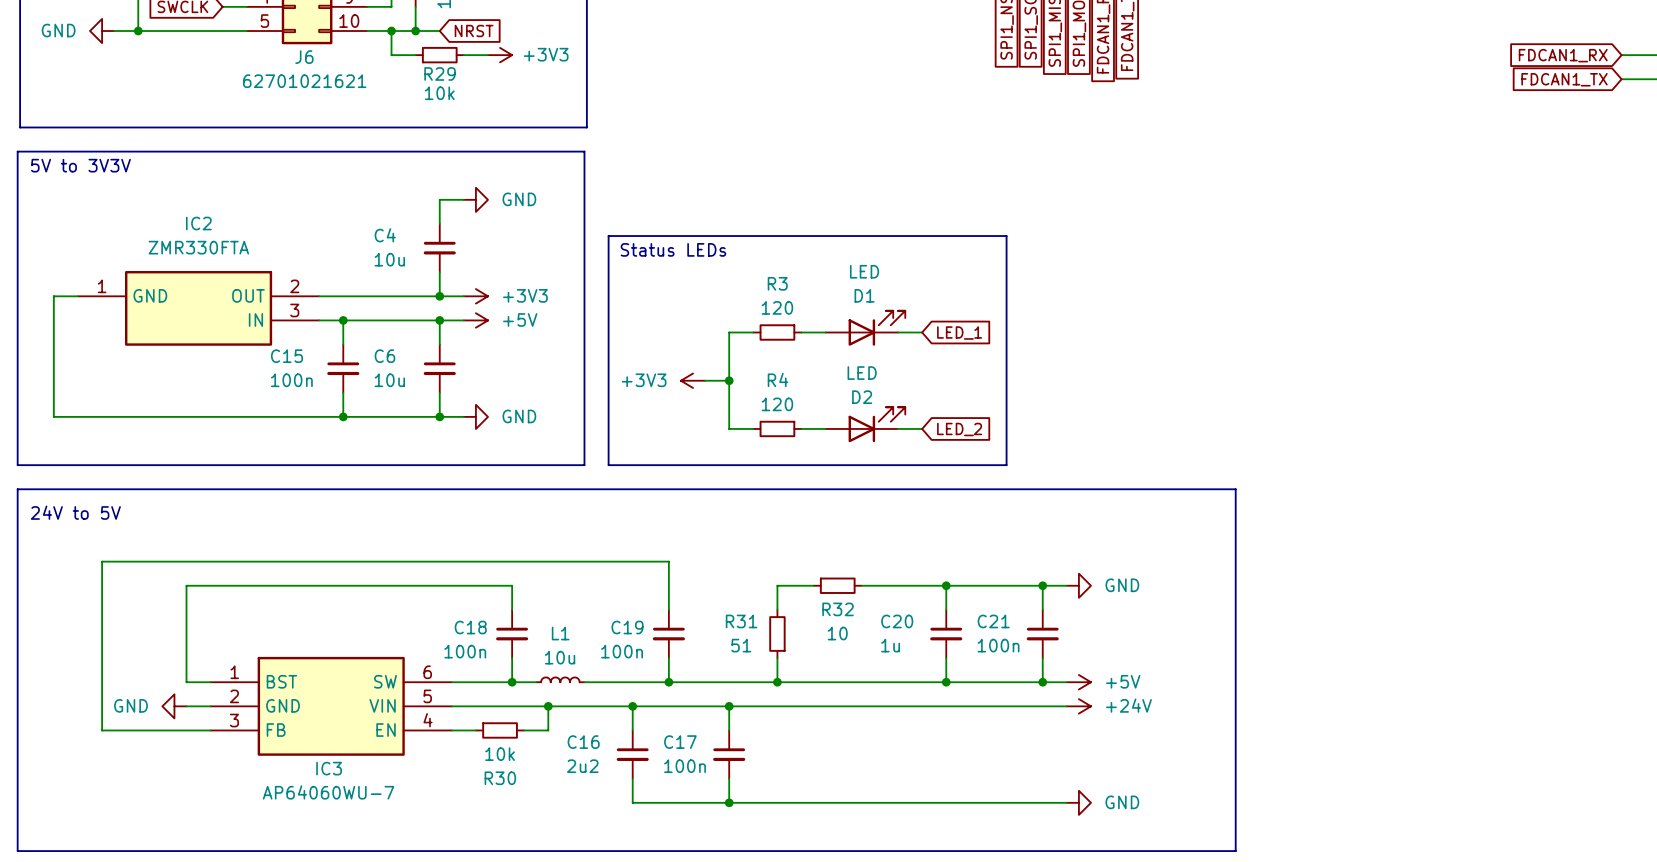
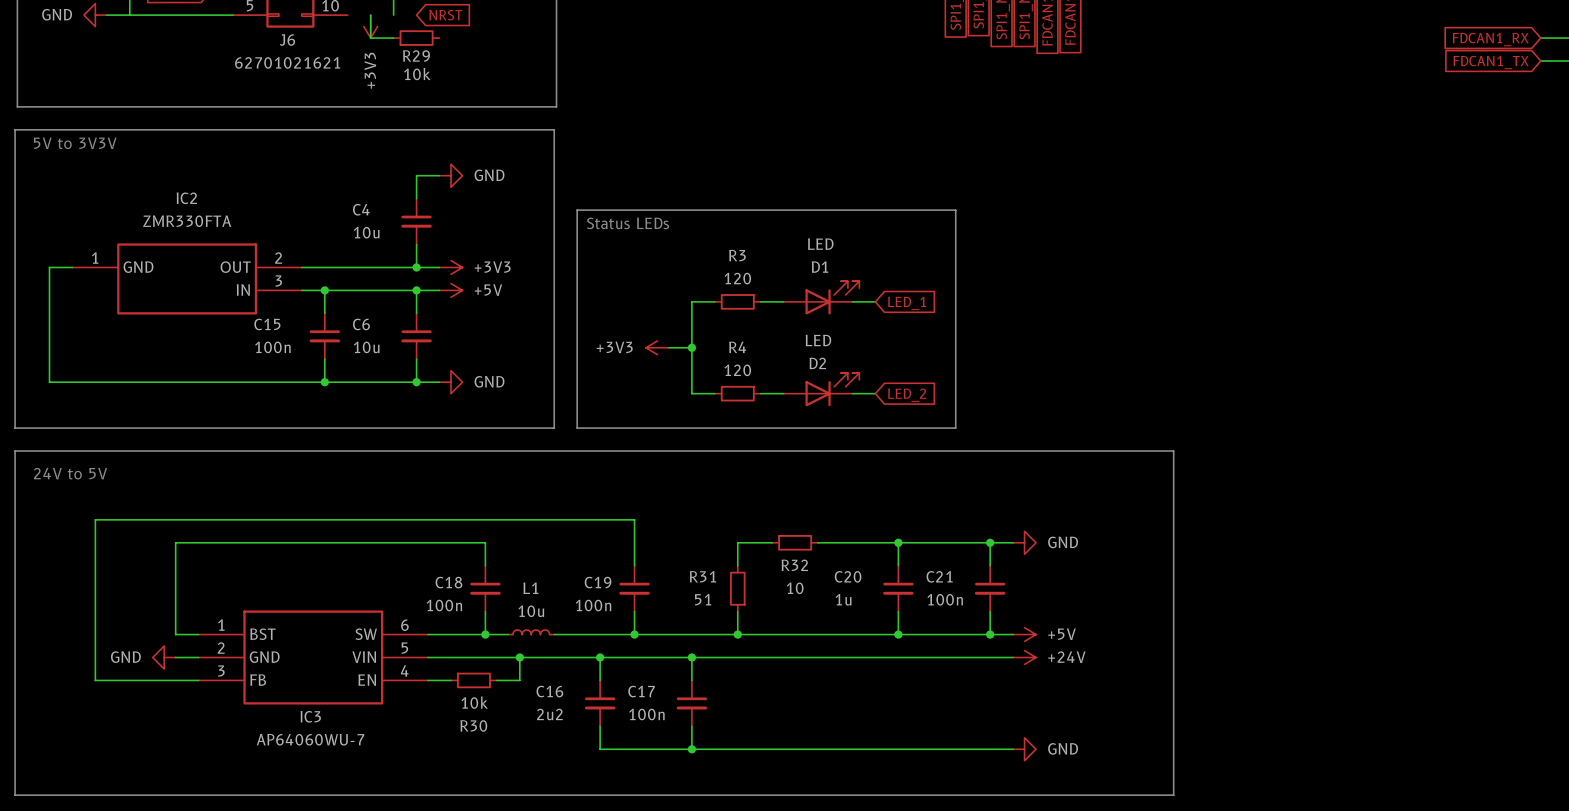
junction: (138, 31) -> none
wire: (367, 31) (439, 31) -> none
junction: (391, 31) -> none
junction: (415, 31) -> none
wire: (463, 55) (488, 55) -> none
power symbol rotation: 0° (500, 55) -> 90° clockwise (370, 26)
power symbol position: +3V3 (500, 55) -> +3V3 (370, 26)

